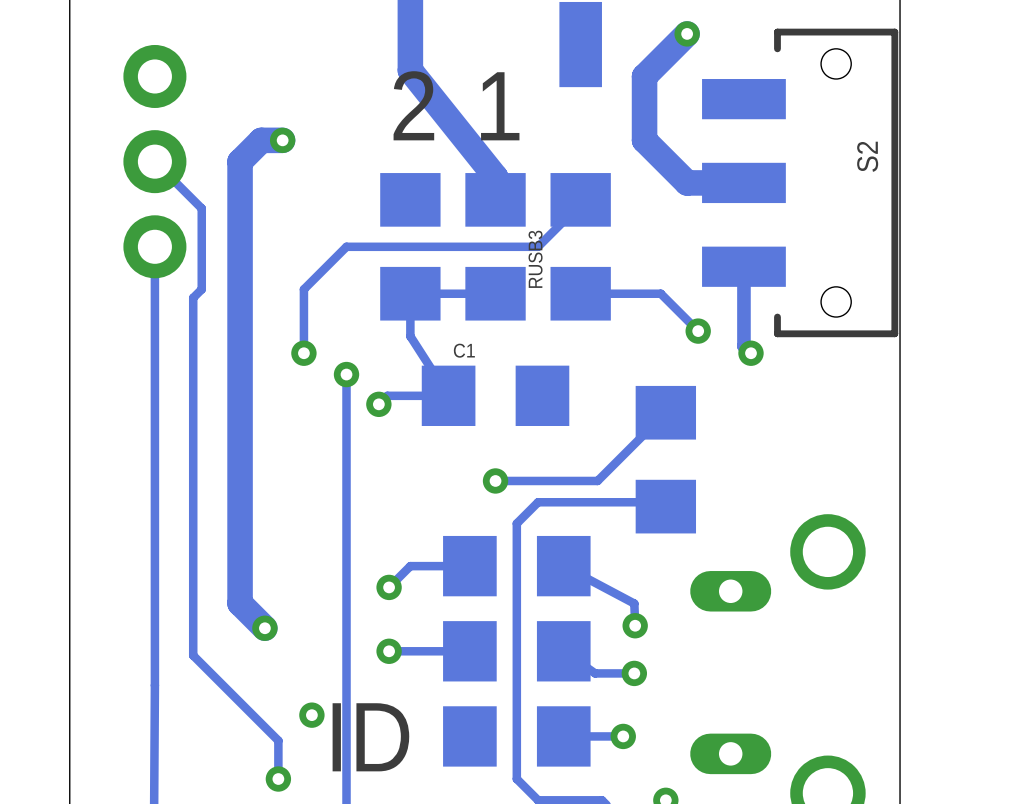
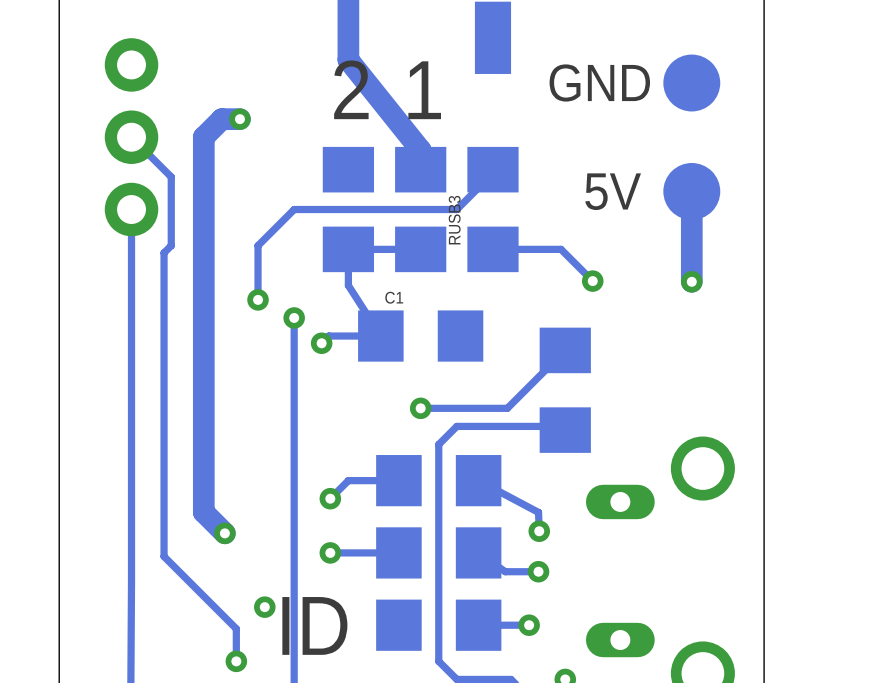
track: (687, 33) (644, 76) (644, 140) (687, 182) (743, 182) -> none
via: (687, 33) -> none
text: none -> GND (599, 82)
part: none -> (691, 83)
S2: (800, 182) -> none
text: none -> 5V (613, 191)
track: none -> (691, 191) (691, 281)
part: none -> (691, 191)
track: (743, 266) (743, 346) (750, 353) -> none
via position: (750, 353) -> (691, 281)

